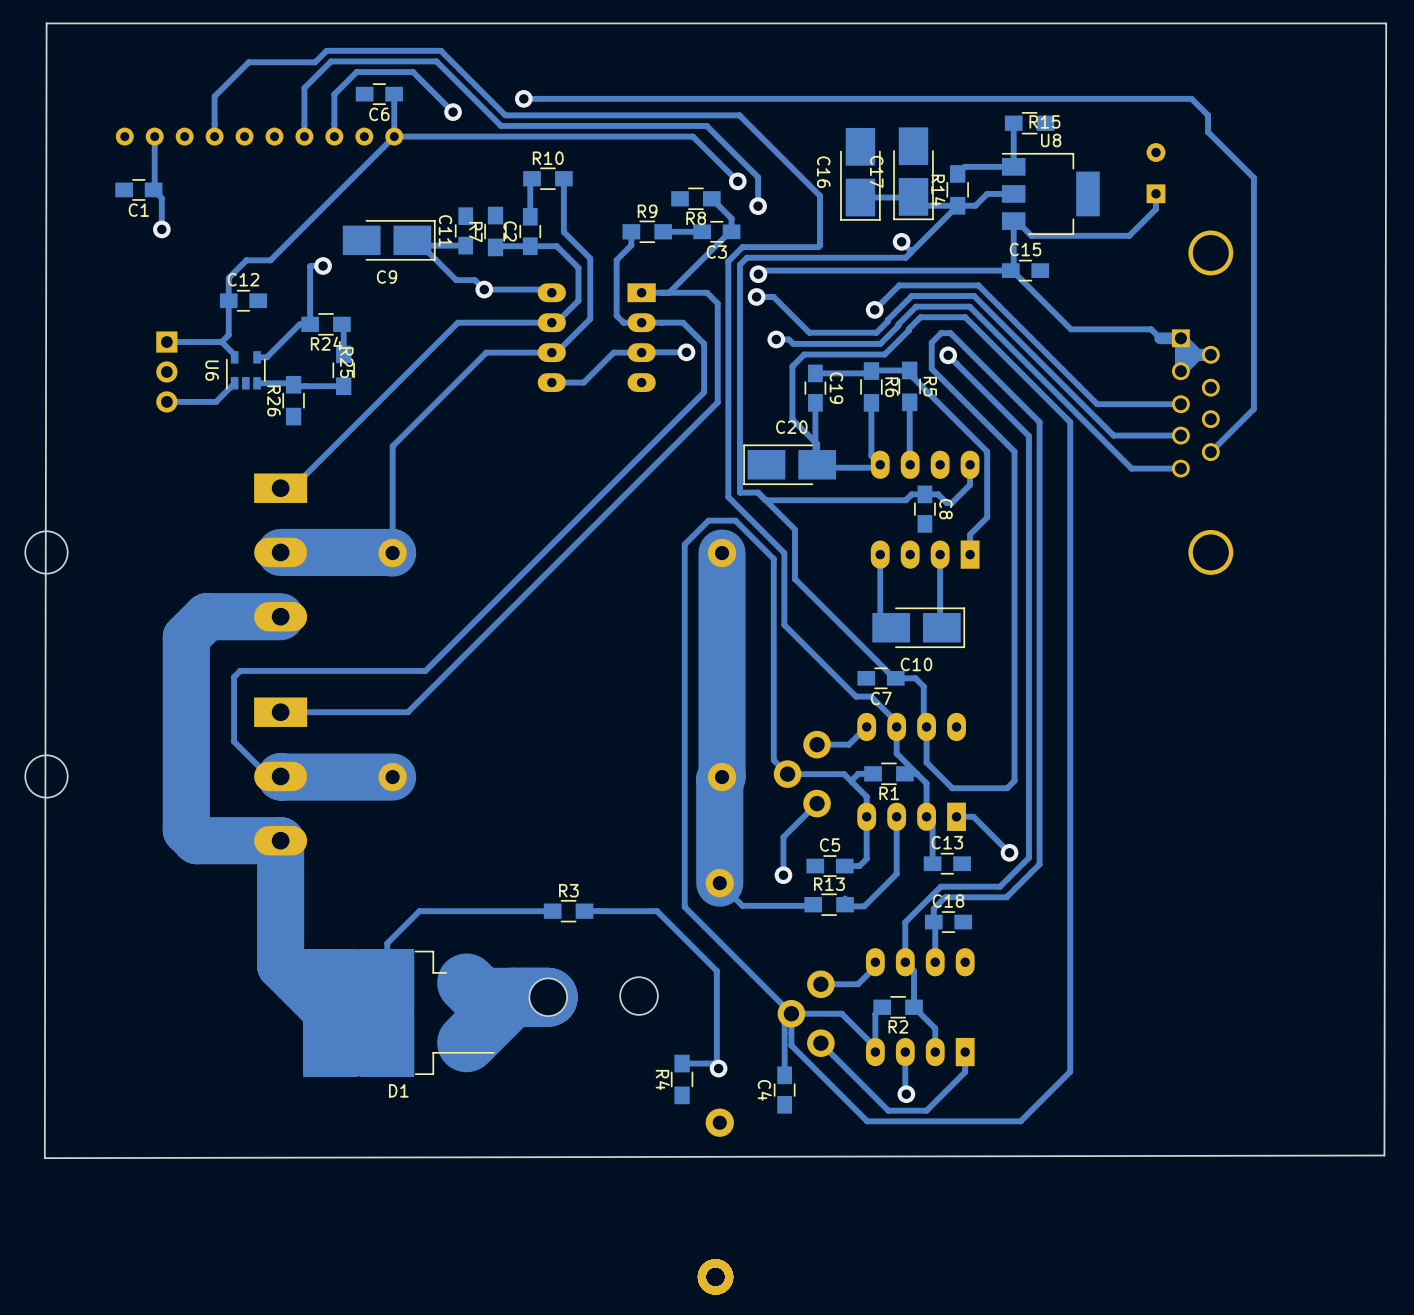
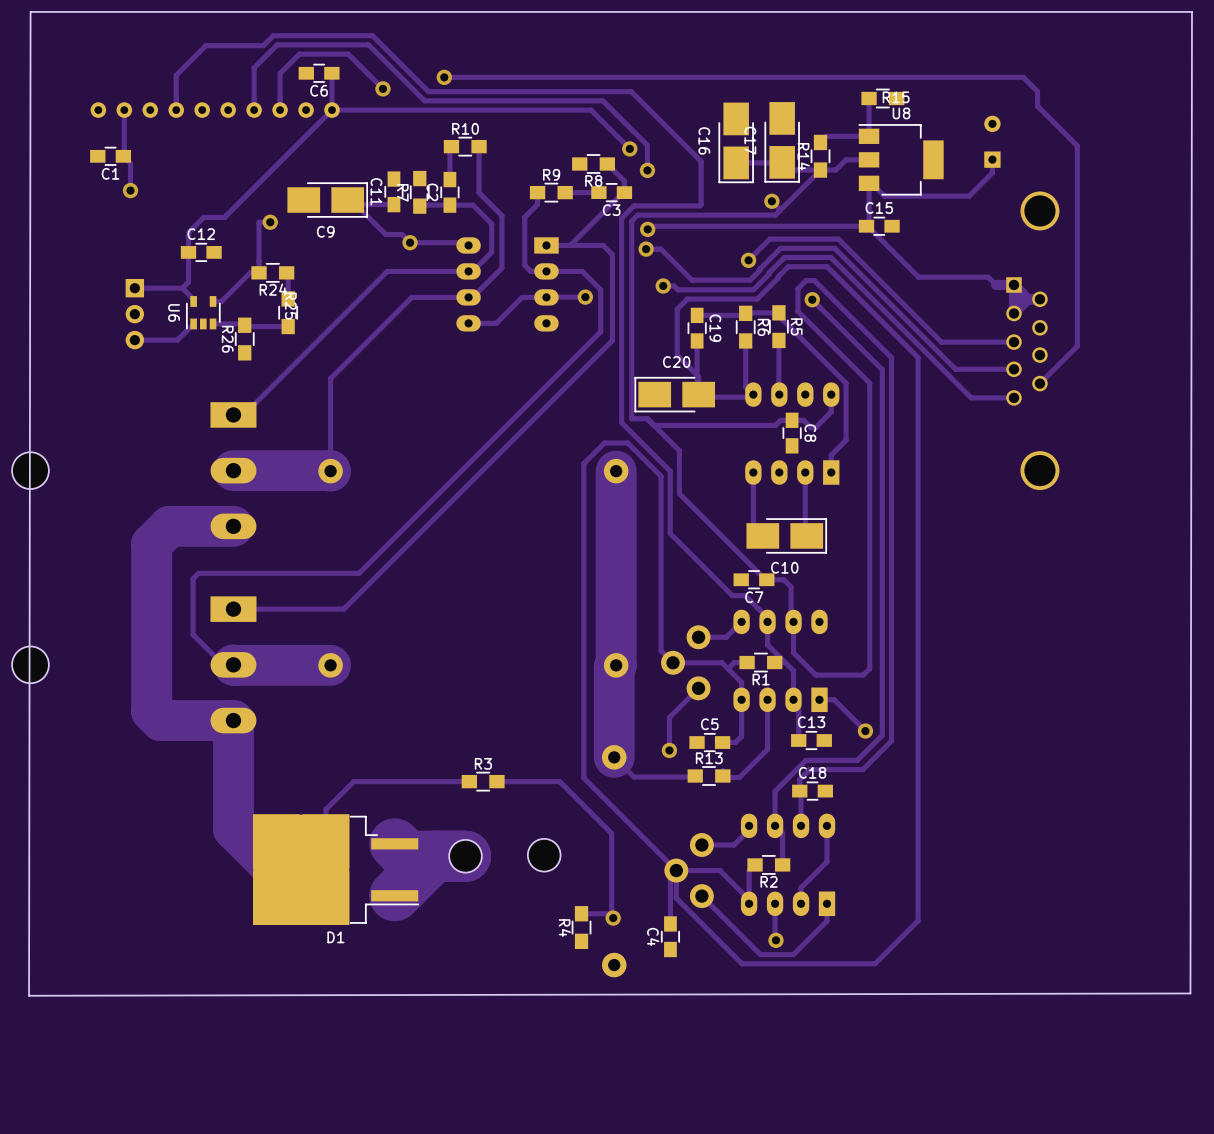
track: (914, 1007) (935, 1028) (935, 1033) -> (826, 825) (826, 861) (801, 887)
part: (715, 1276) -> none

